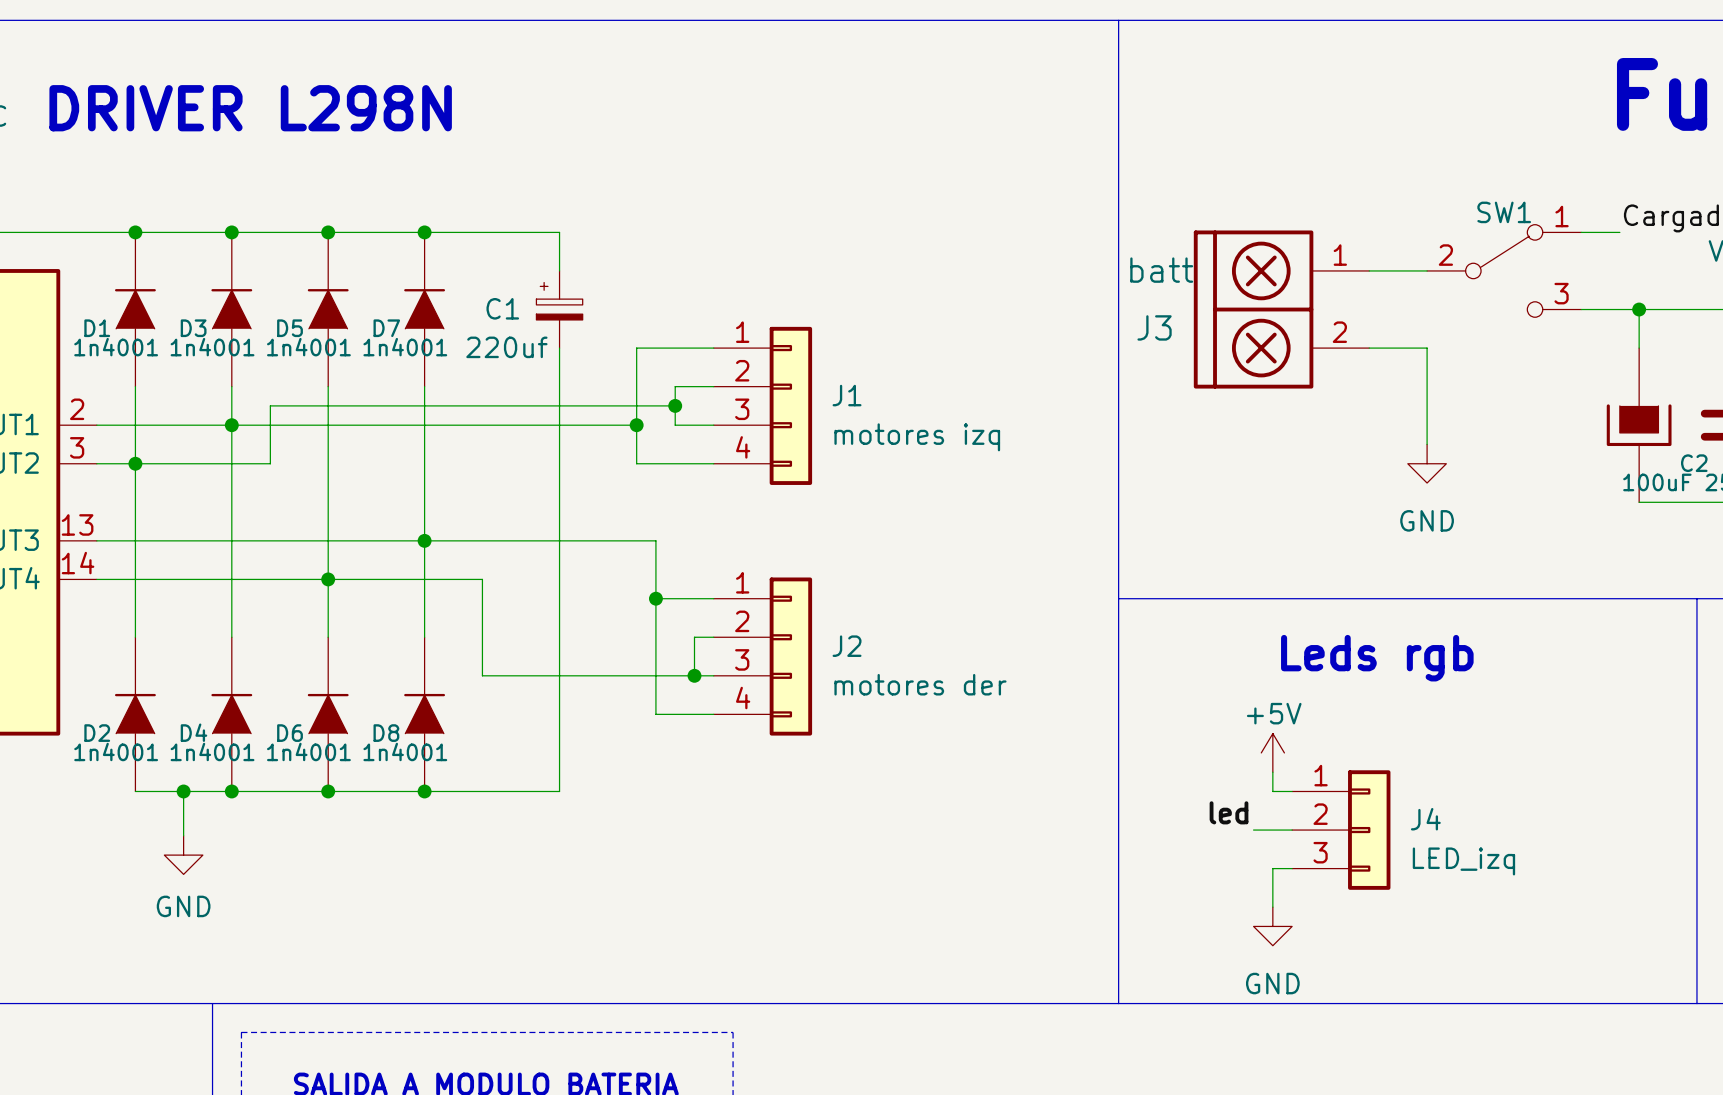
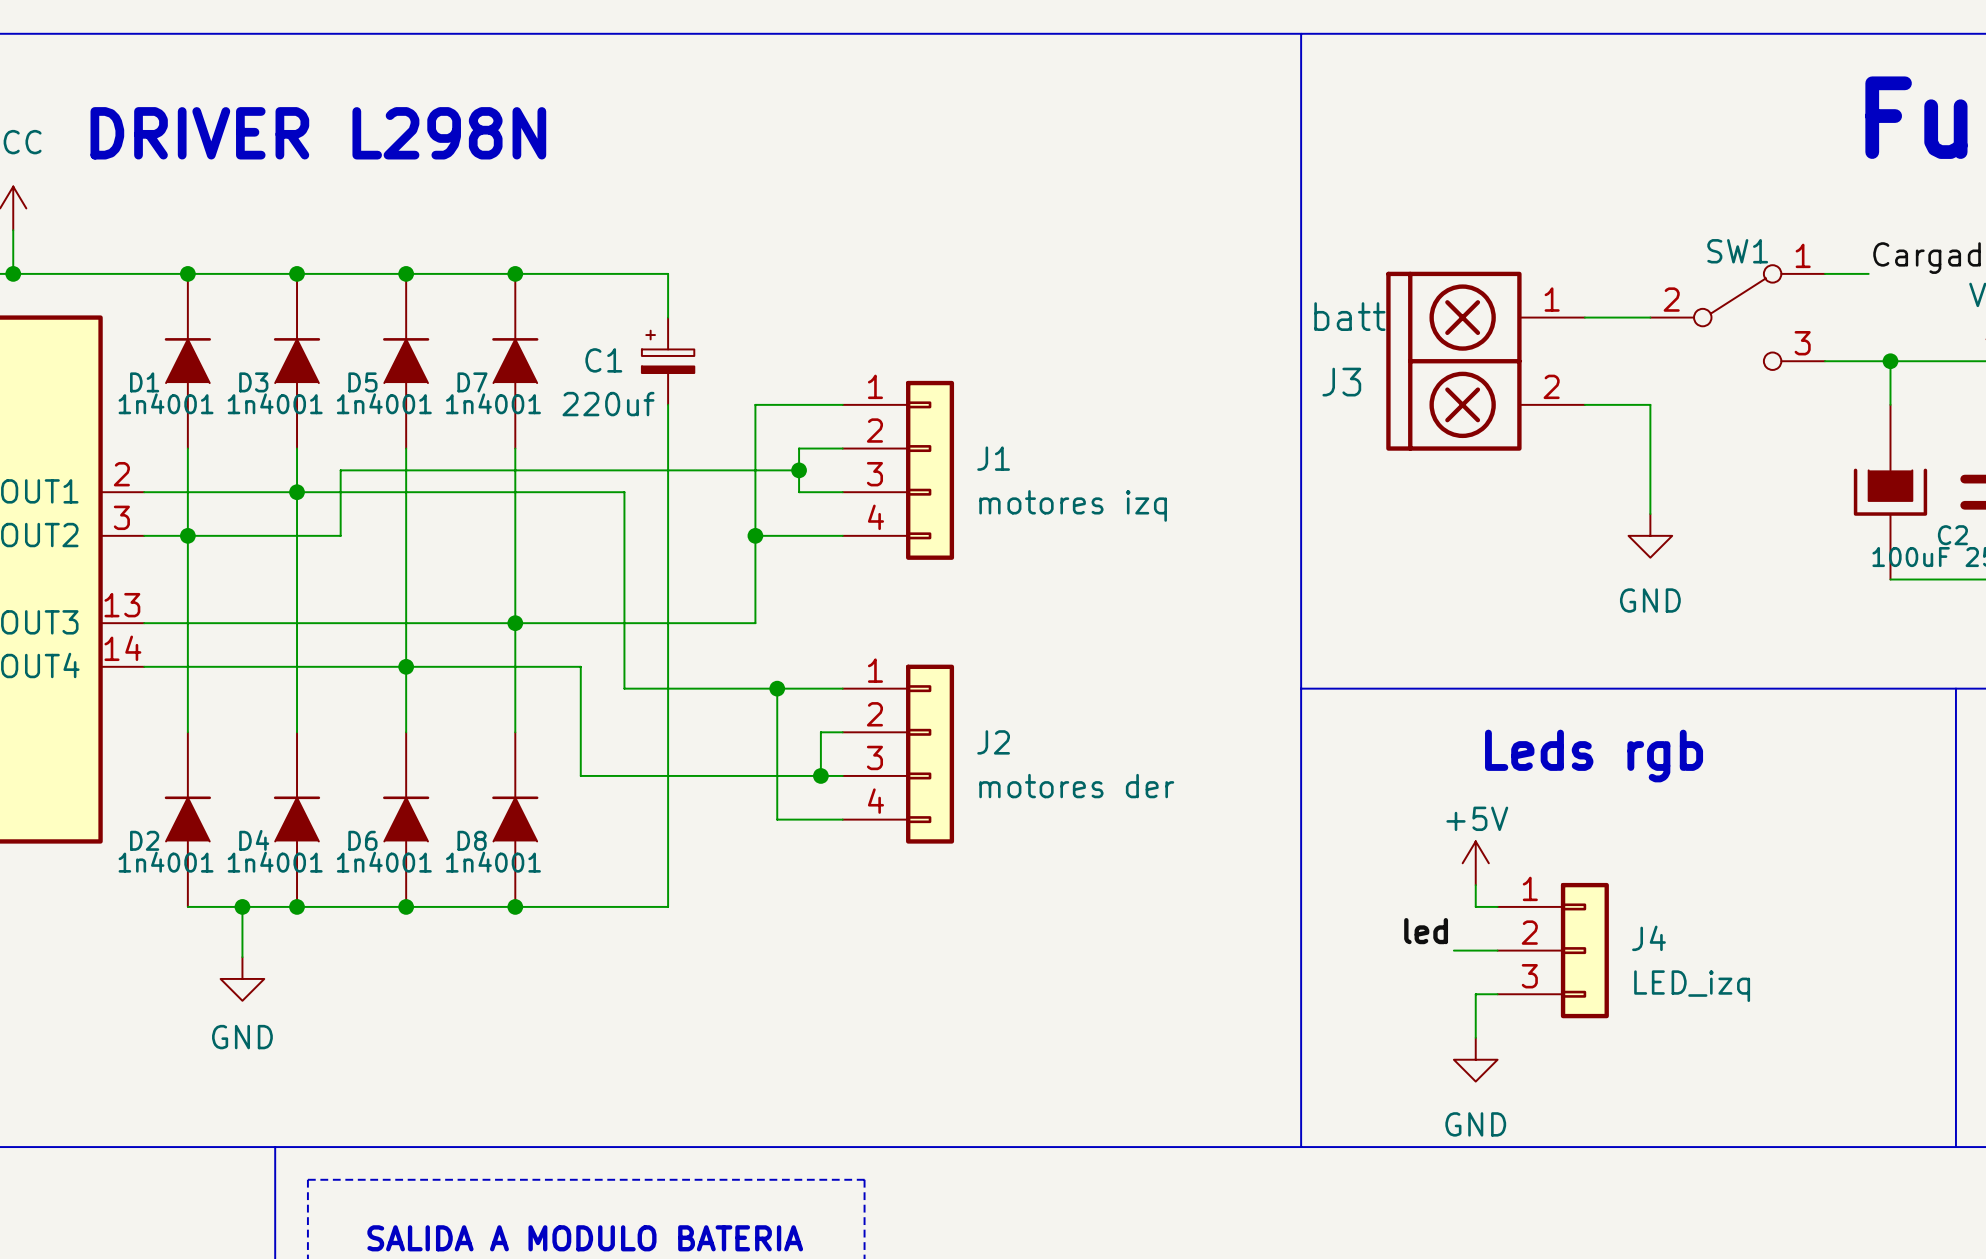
wire: (520, 425) (636, 425) -> (624, 492) (624, 688) (777, 688)
junction position: (636, 425) -> (755, 535)
wire: (636, 540) (655, 540) (655, 598) -> (755, 623) (755, 535)

